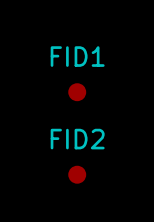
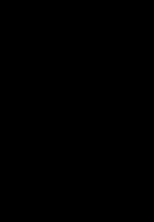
FID1: (77, 92) -> none
FID2: (77, 174) -> none

